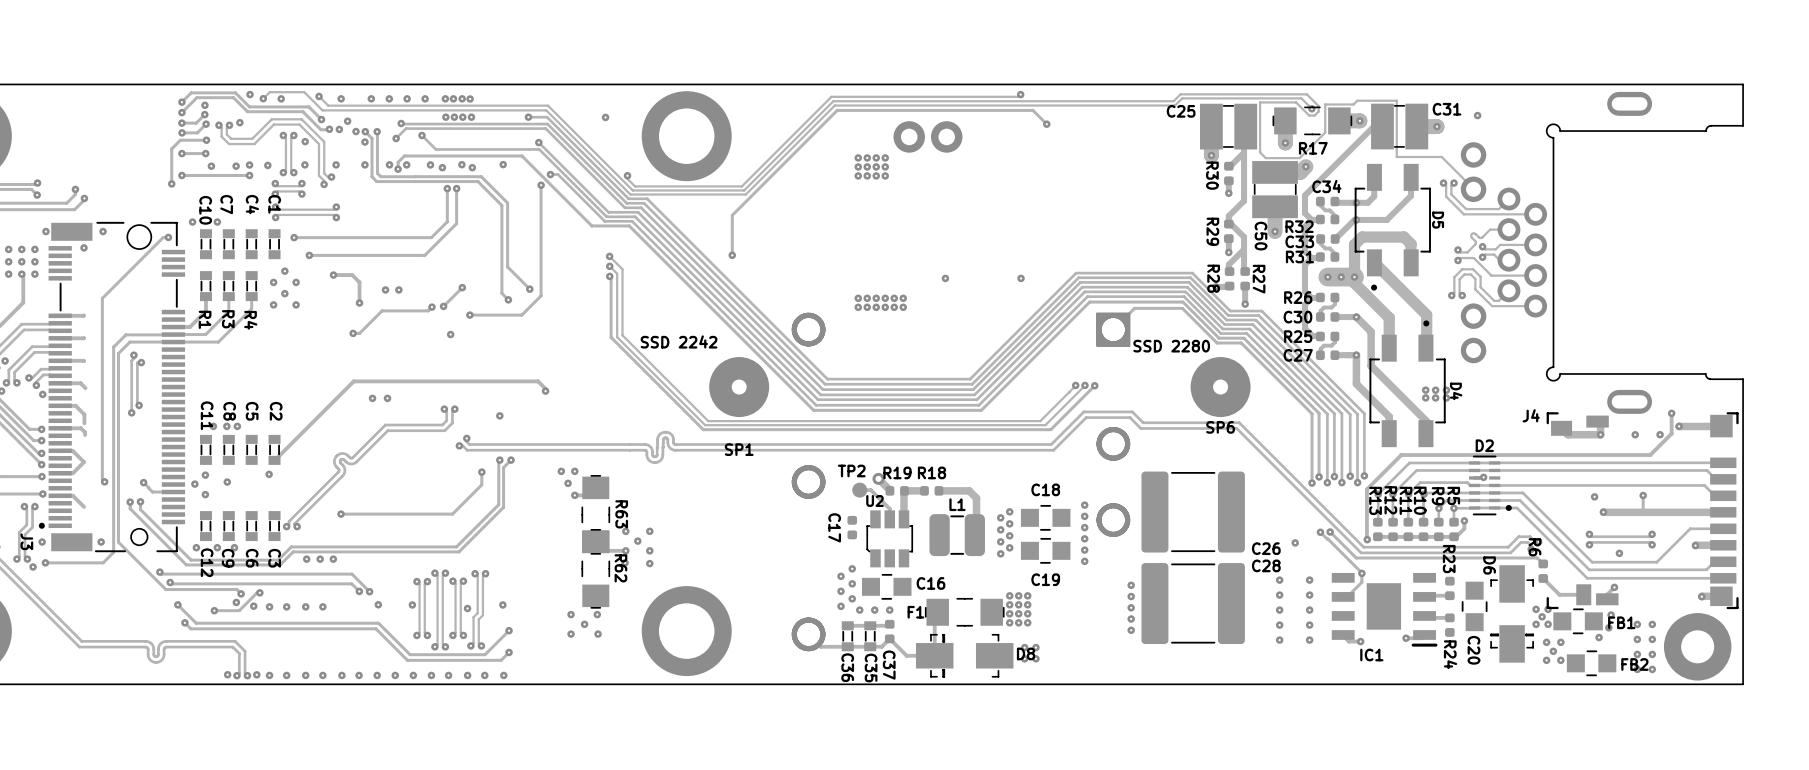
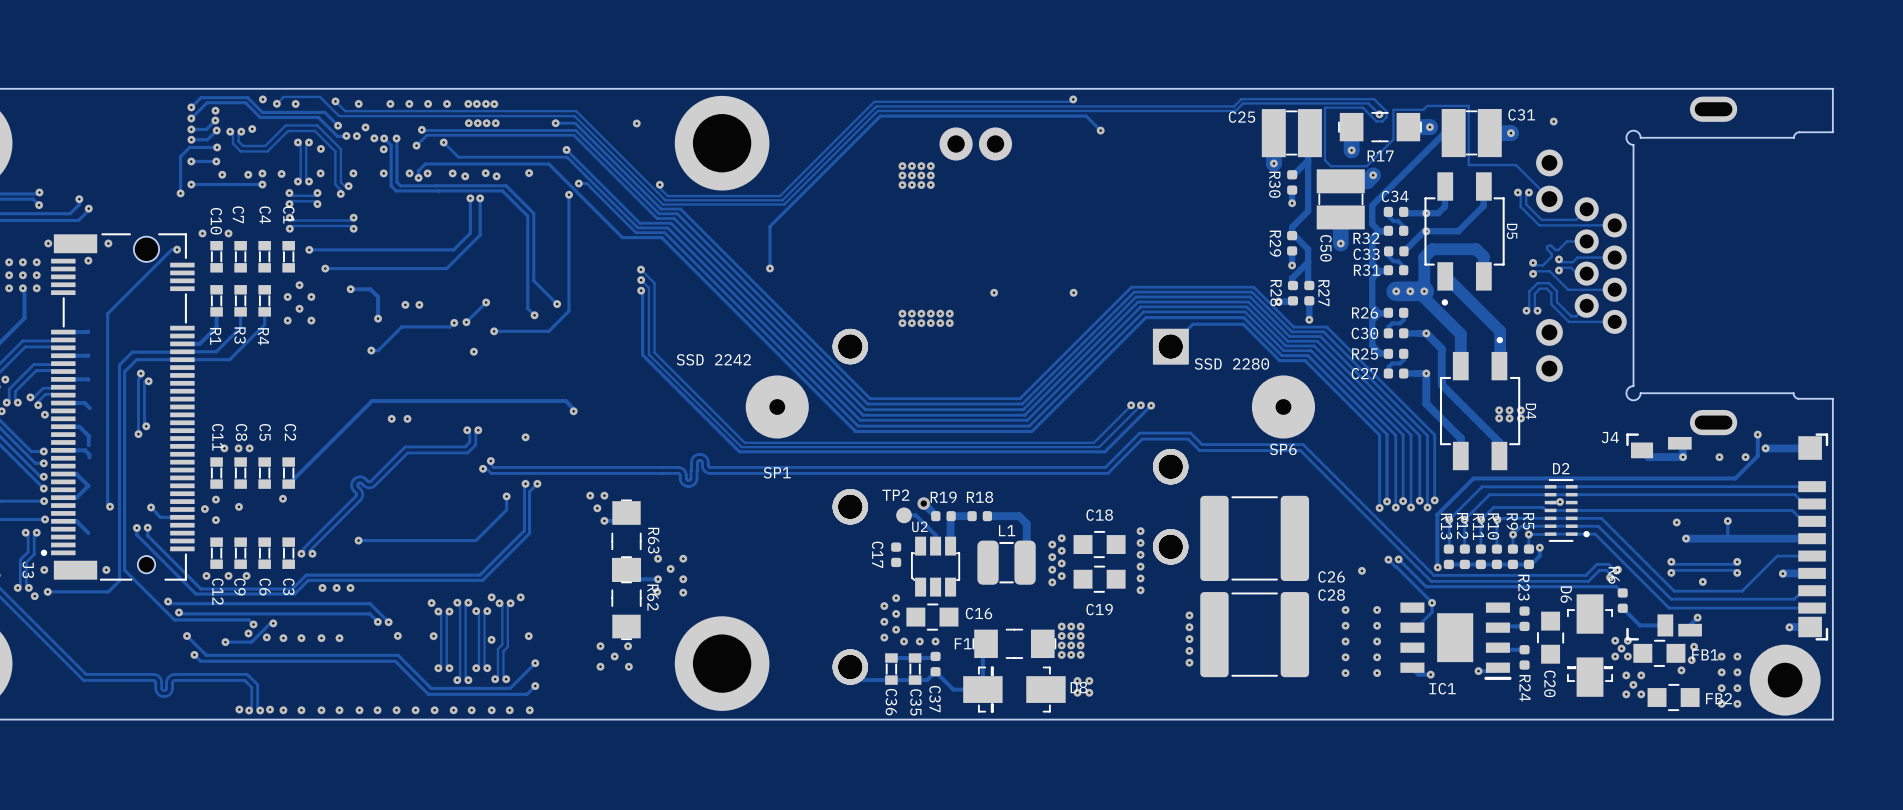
via: none -> (491, 597)
via: none -> (520, 597)
via: none -> (431, 603)

